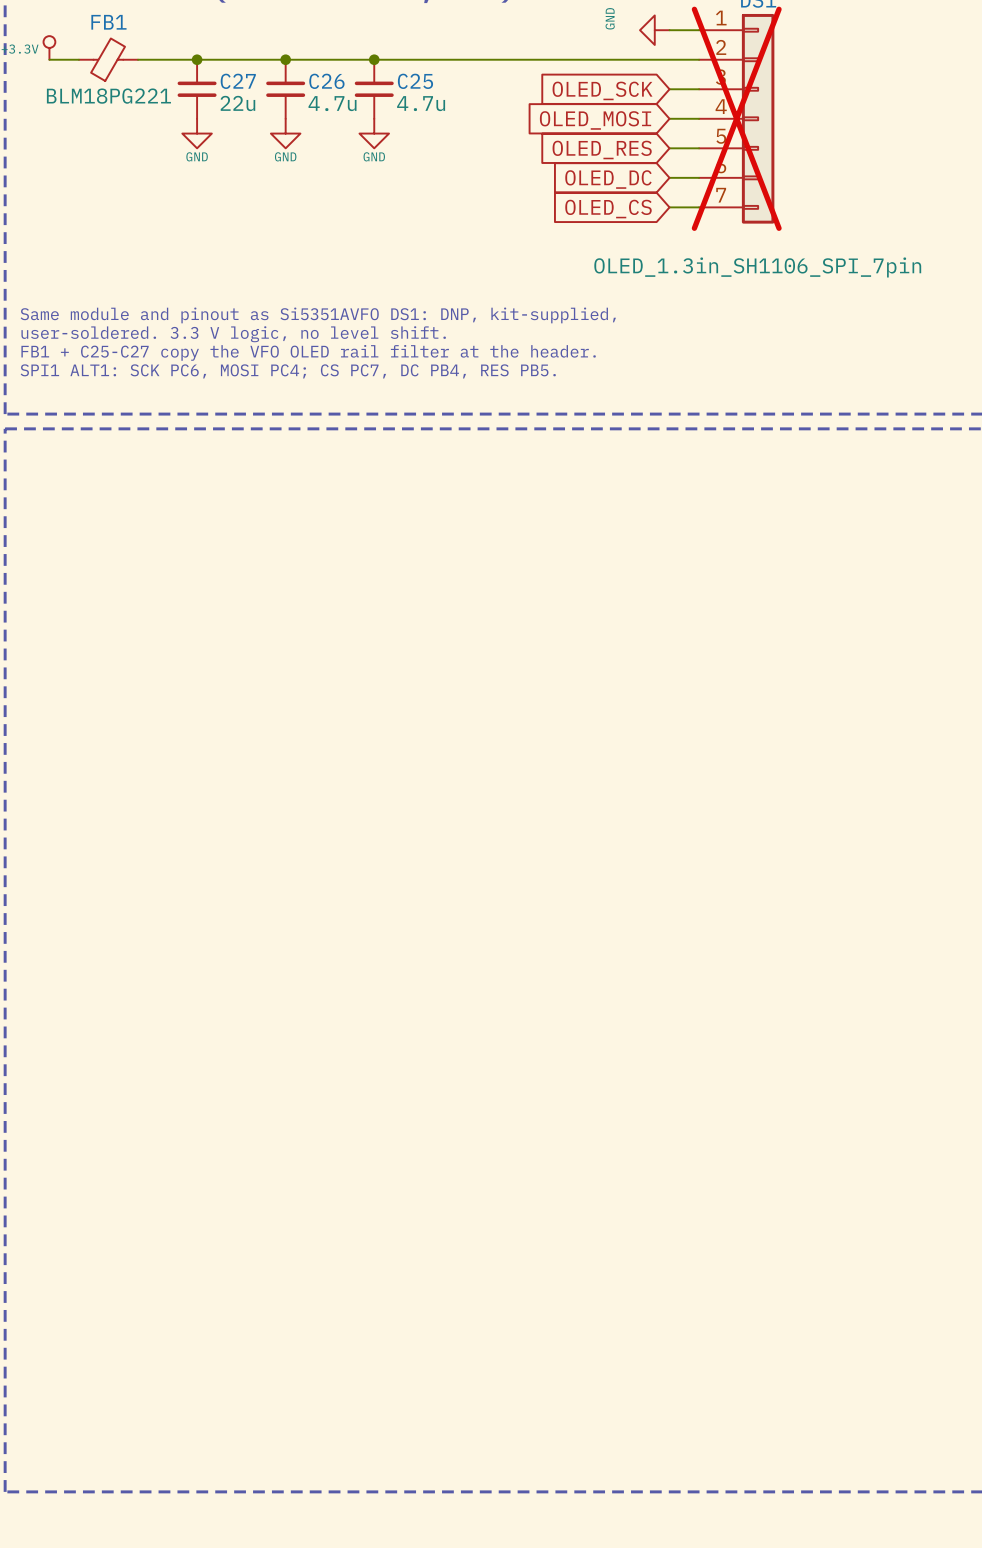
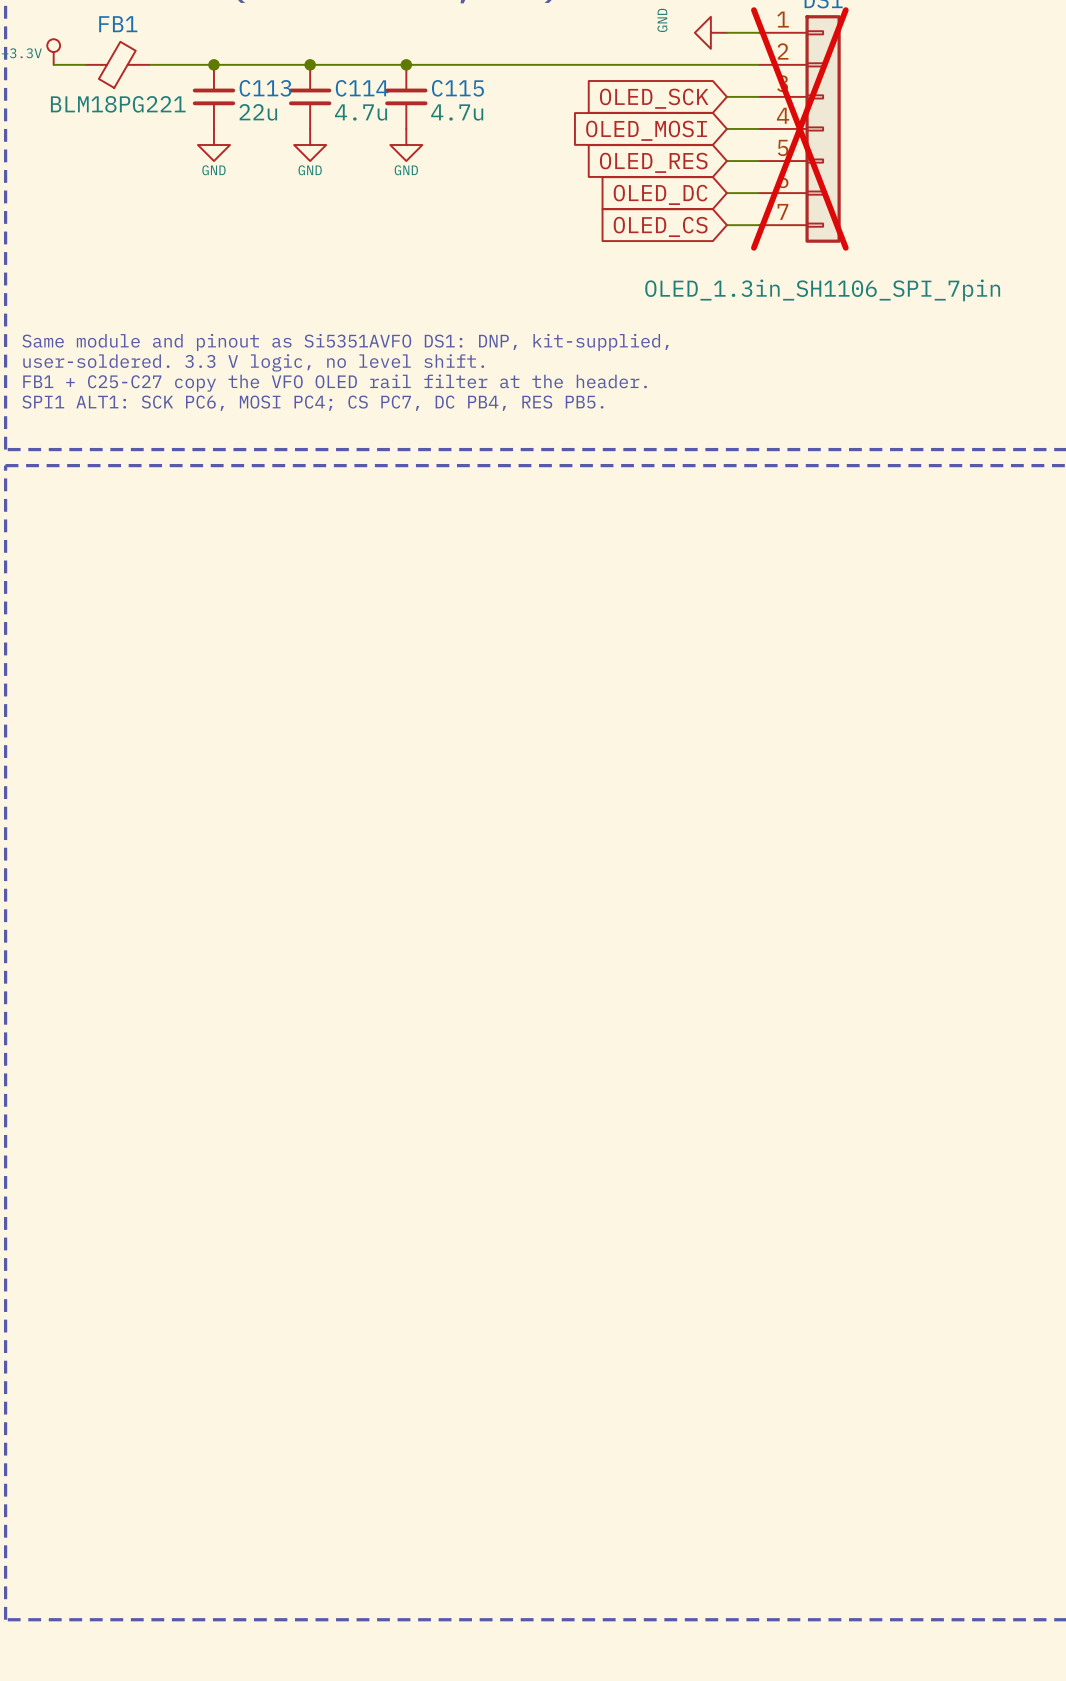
C27 name: C27 (238, 81) -> C113 (265, 88)
C26 name: C26 (326, 81) -> C114 (362, 88)
C25 name: C25 (415, 81) -> C115 (457, 88)

